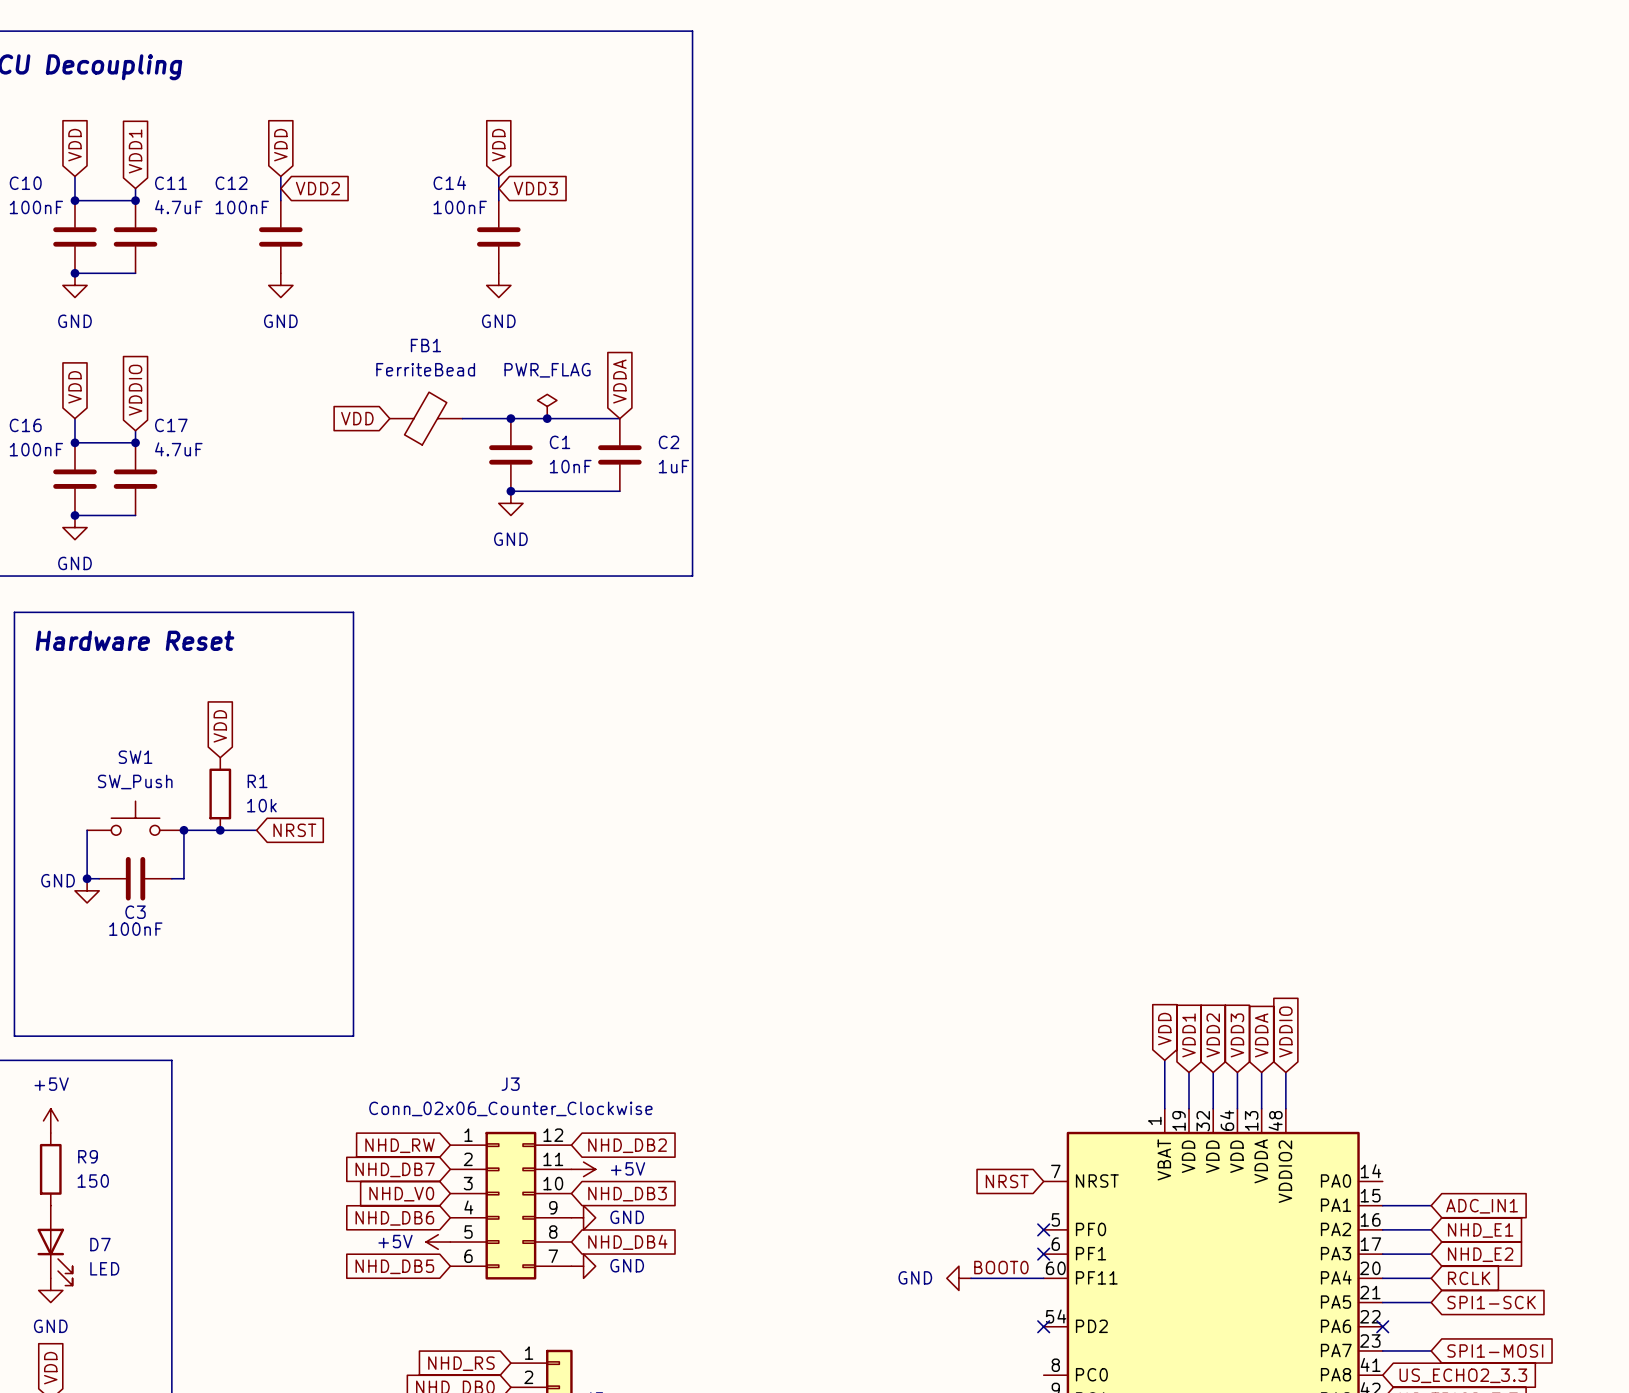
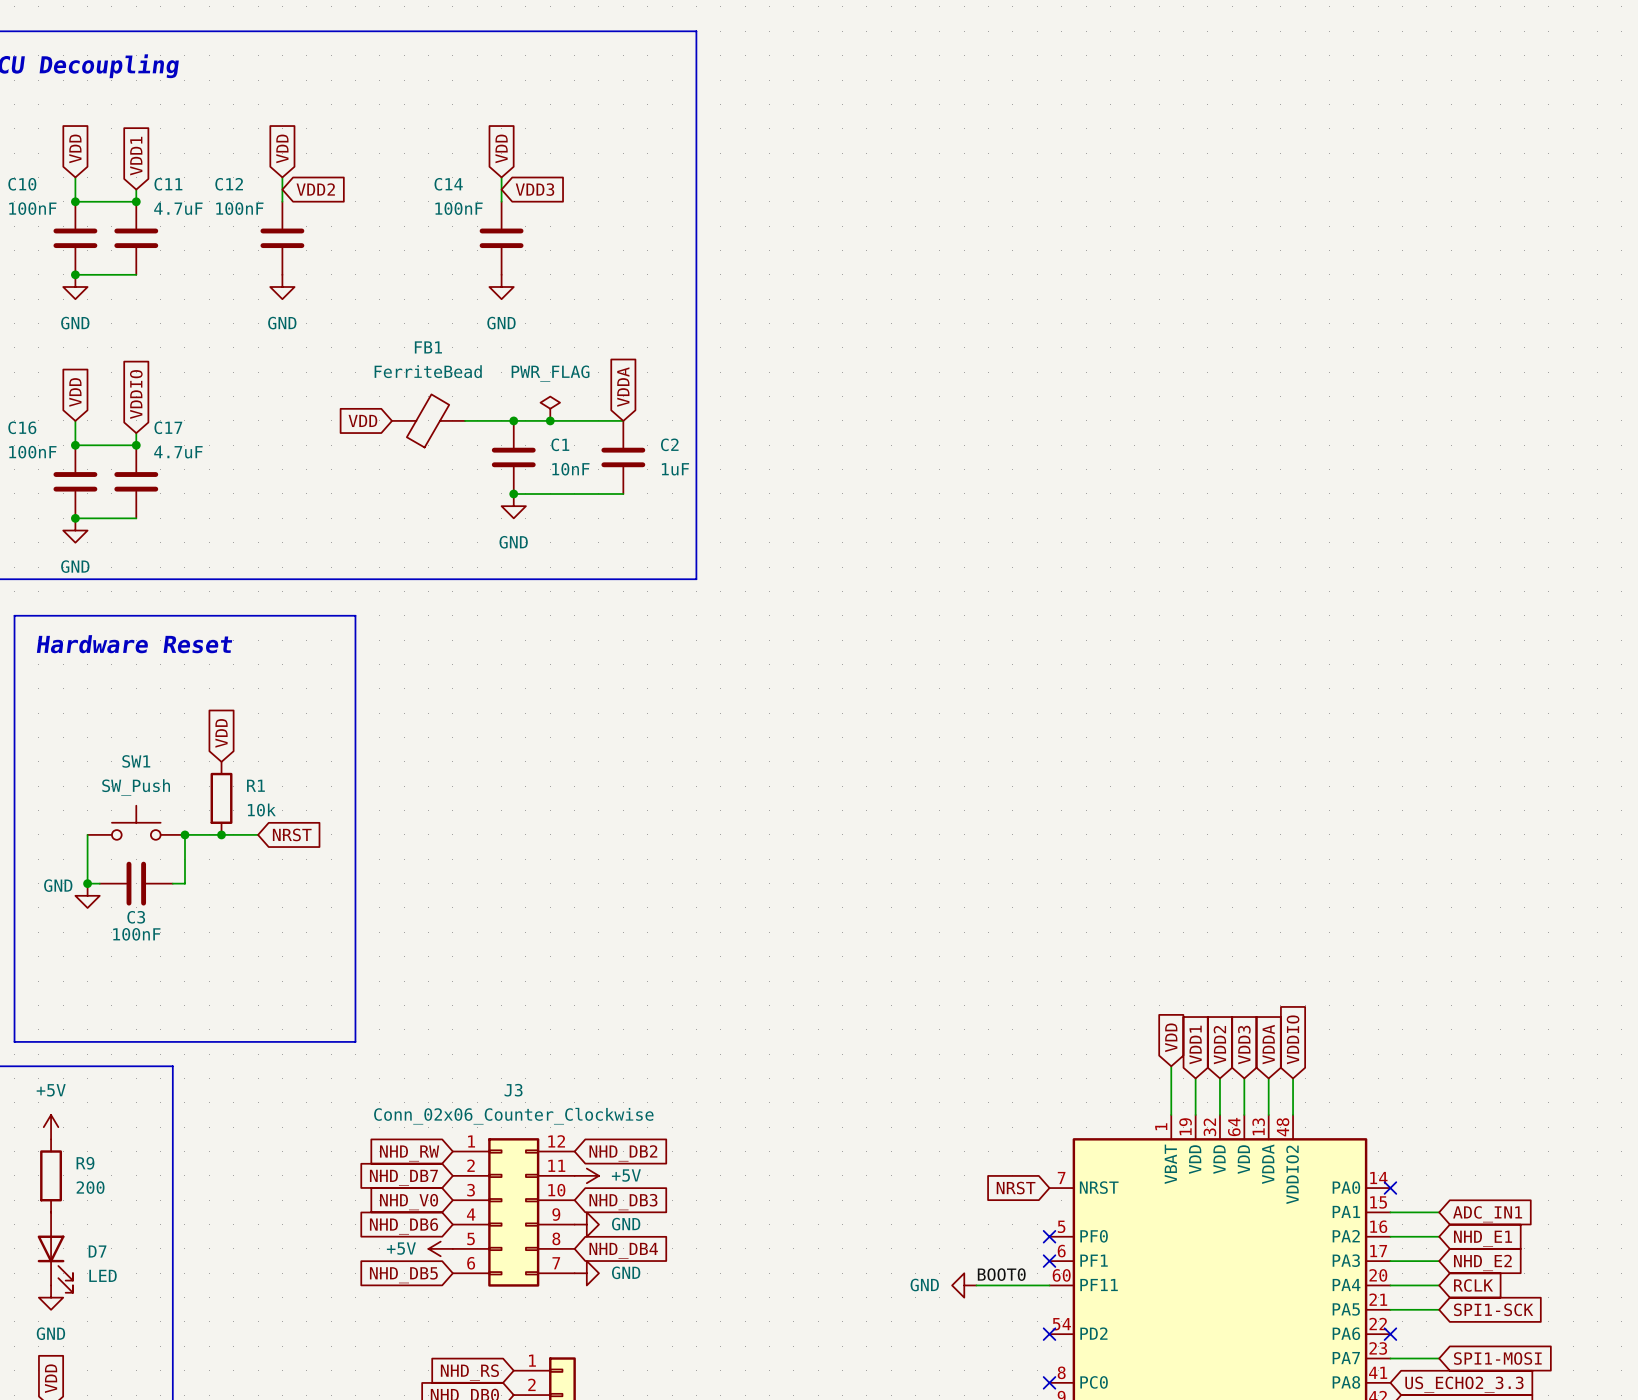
R9 value: 150 (93, 1181) -> 200 (90, 1187)
no-connect mark: none -> (1390, 1188)
no-connect mark: none -> (1049, 1382)

